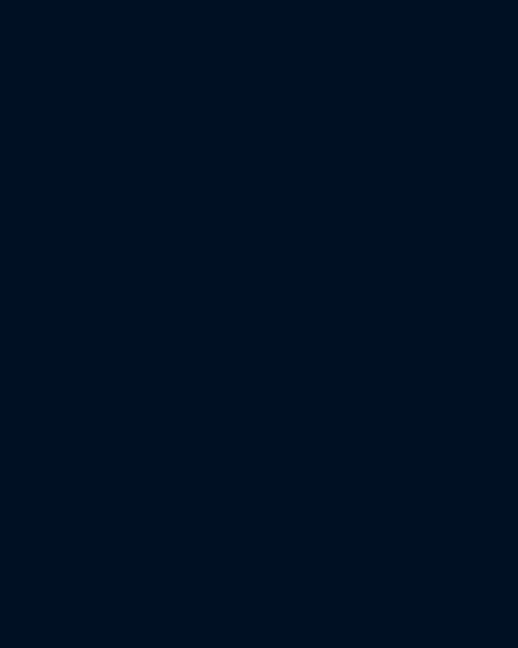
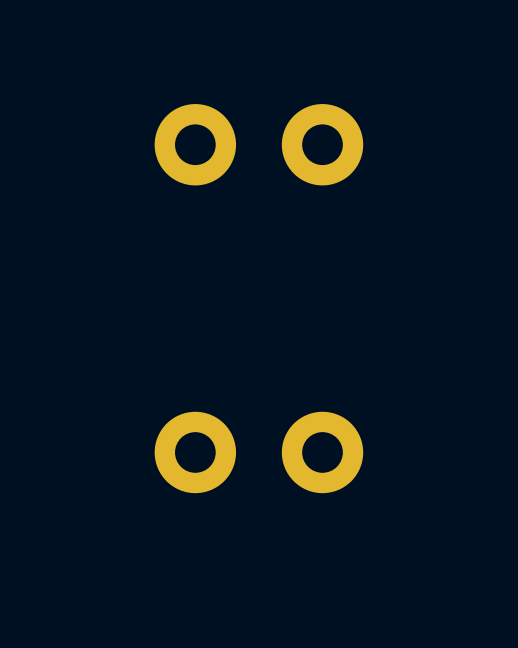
part: none -> (258, 144)
part: none -> (258, 452)

